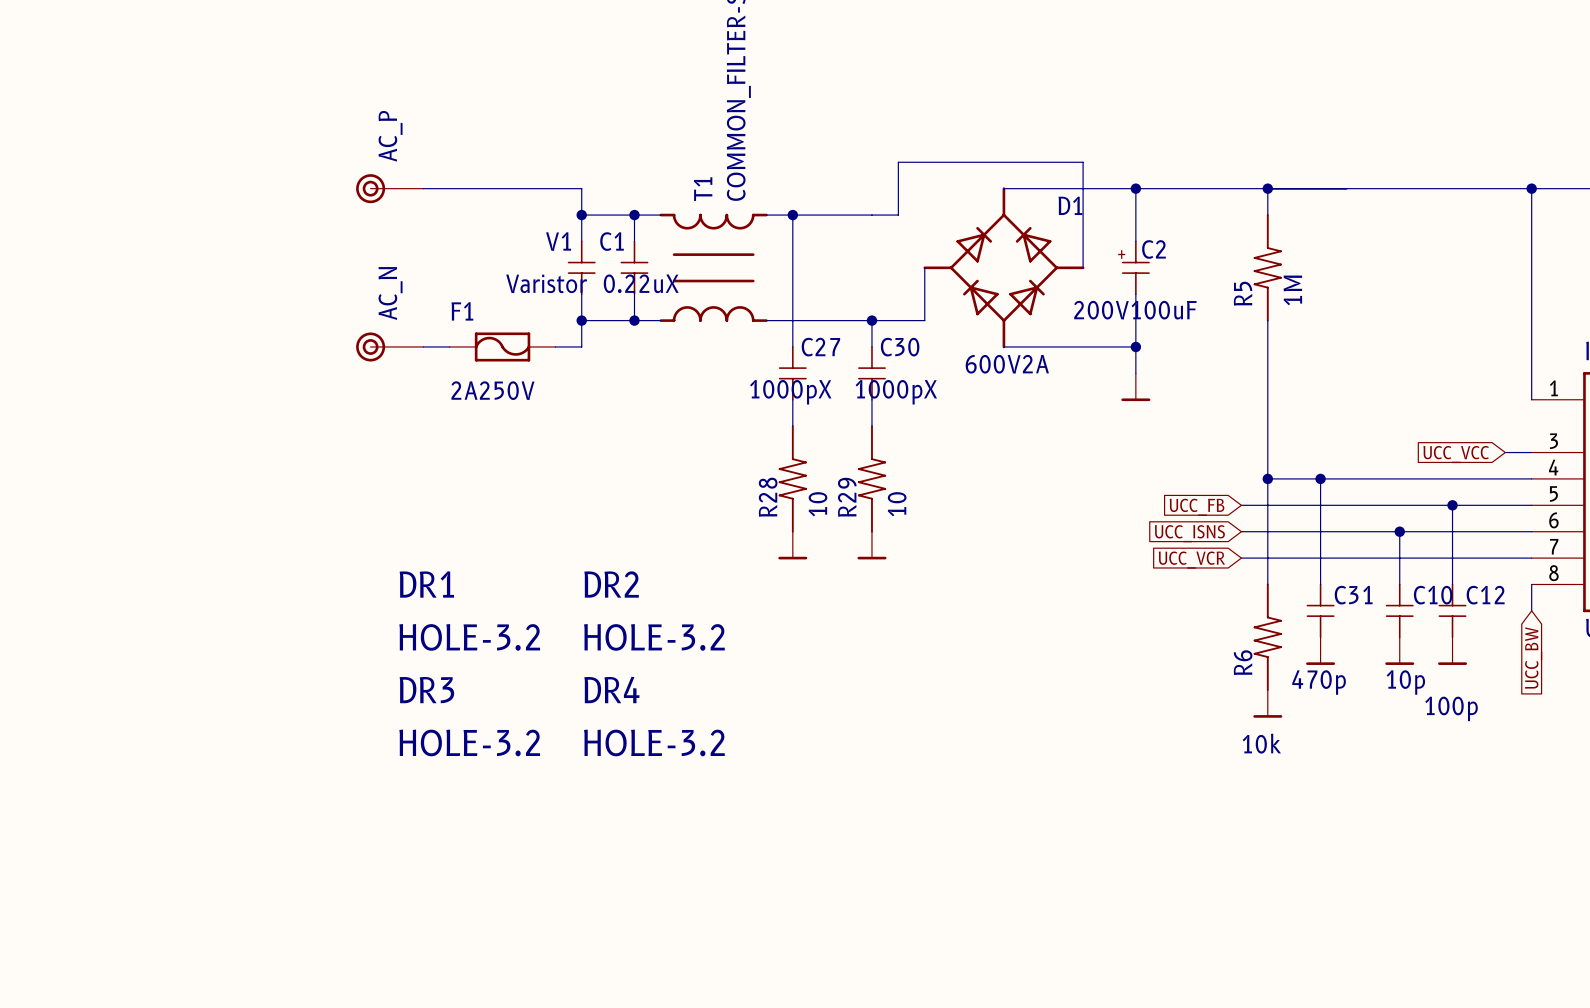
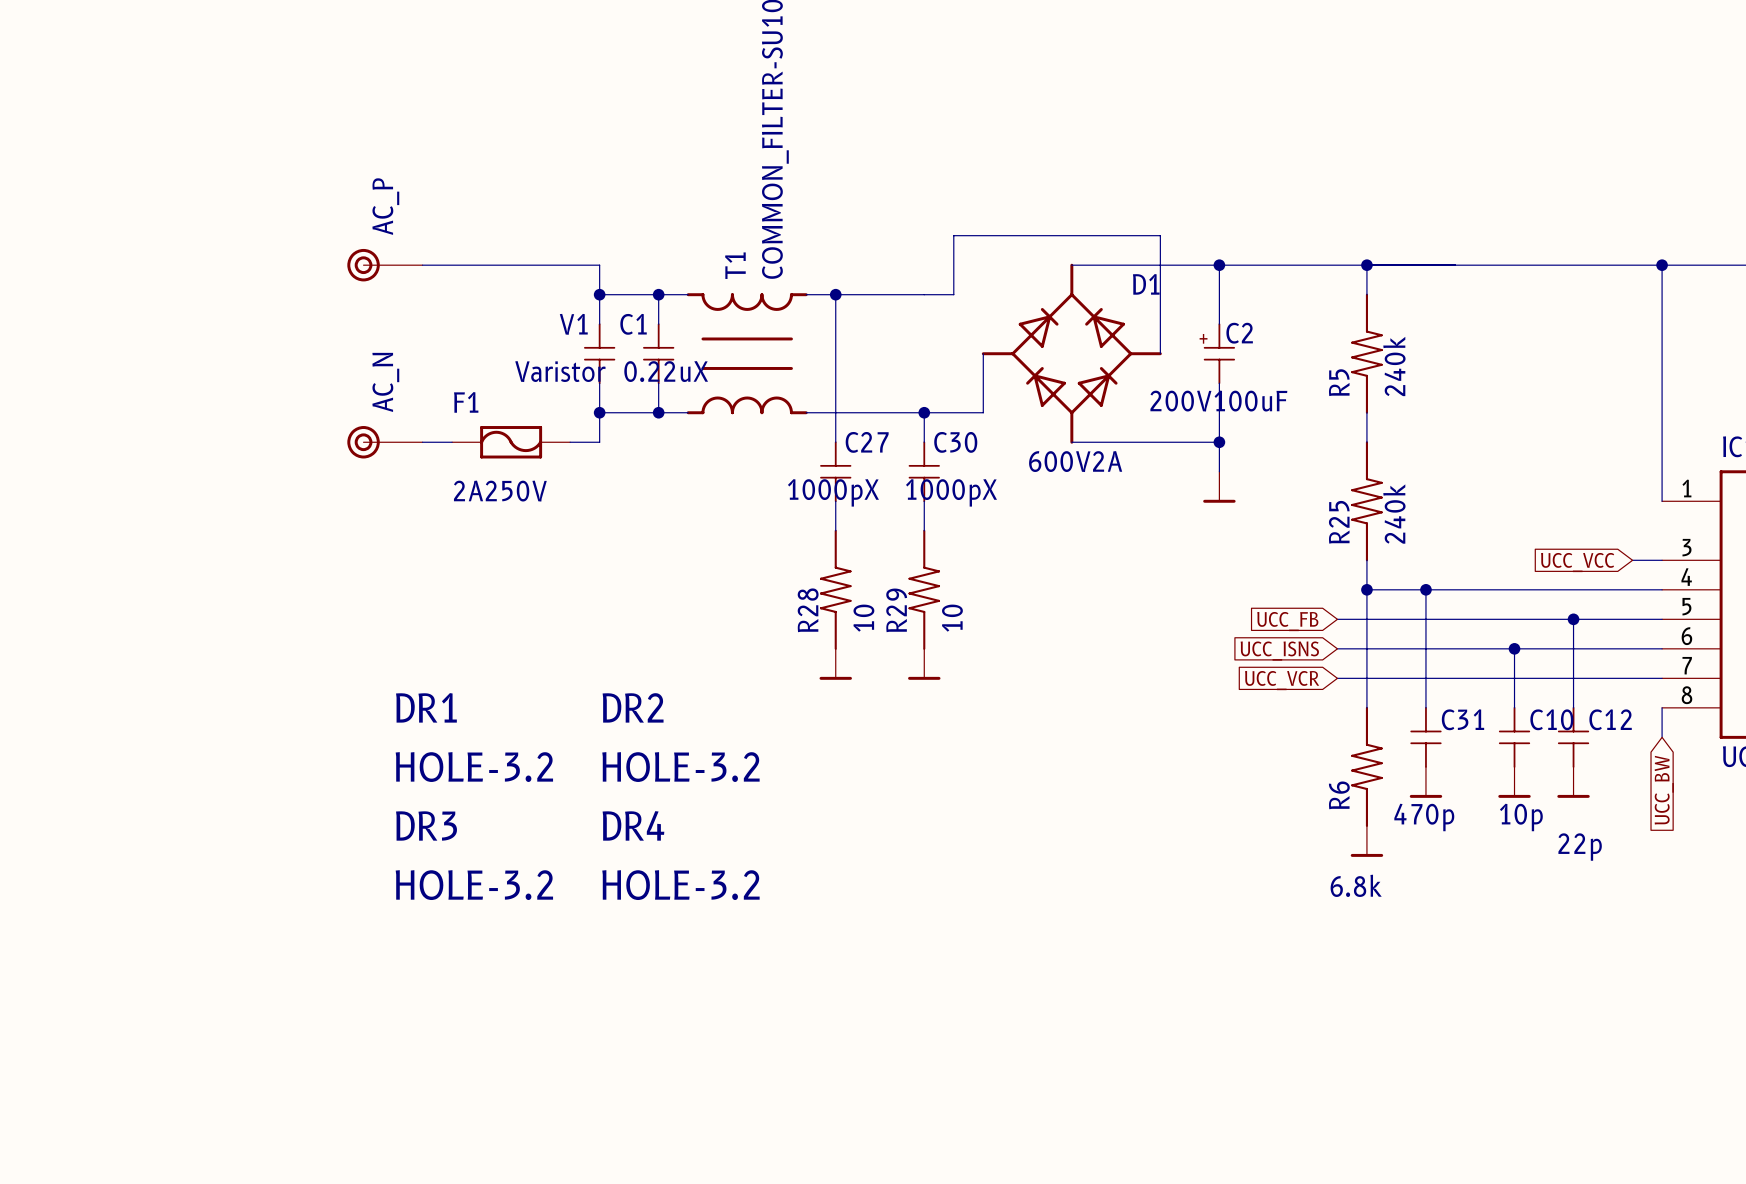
R5 value: 1M (1292, 290) -> 240k (1394, 366)
R25: none -> 240k (1366, 501)
C12 value: 100p (1451, 708) -> 22p (1580, 847)
R6 value: 10k (1261, 743) -> 6.8k (1356, 885)

